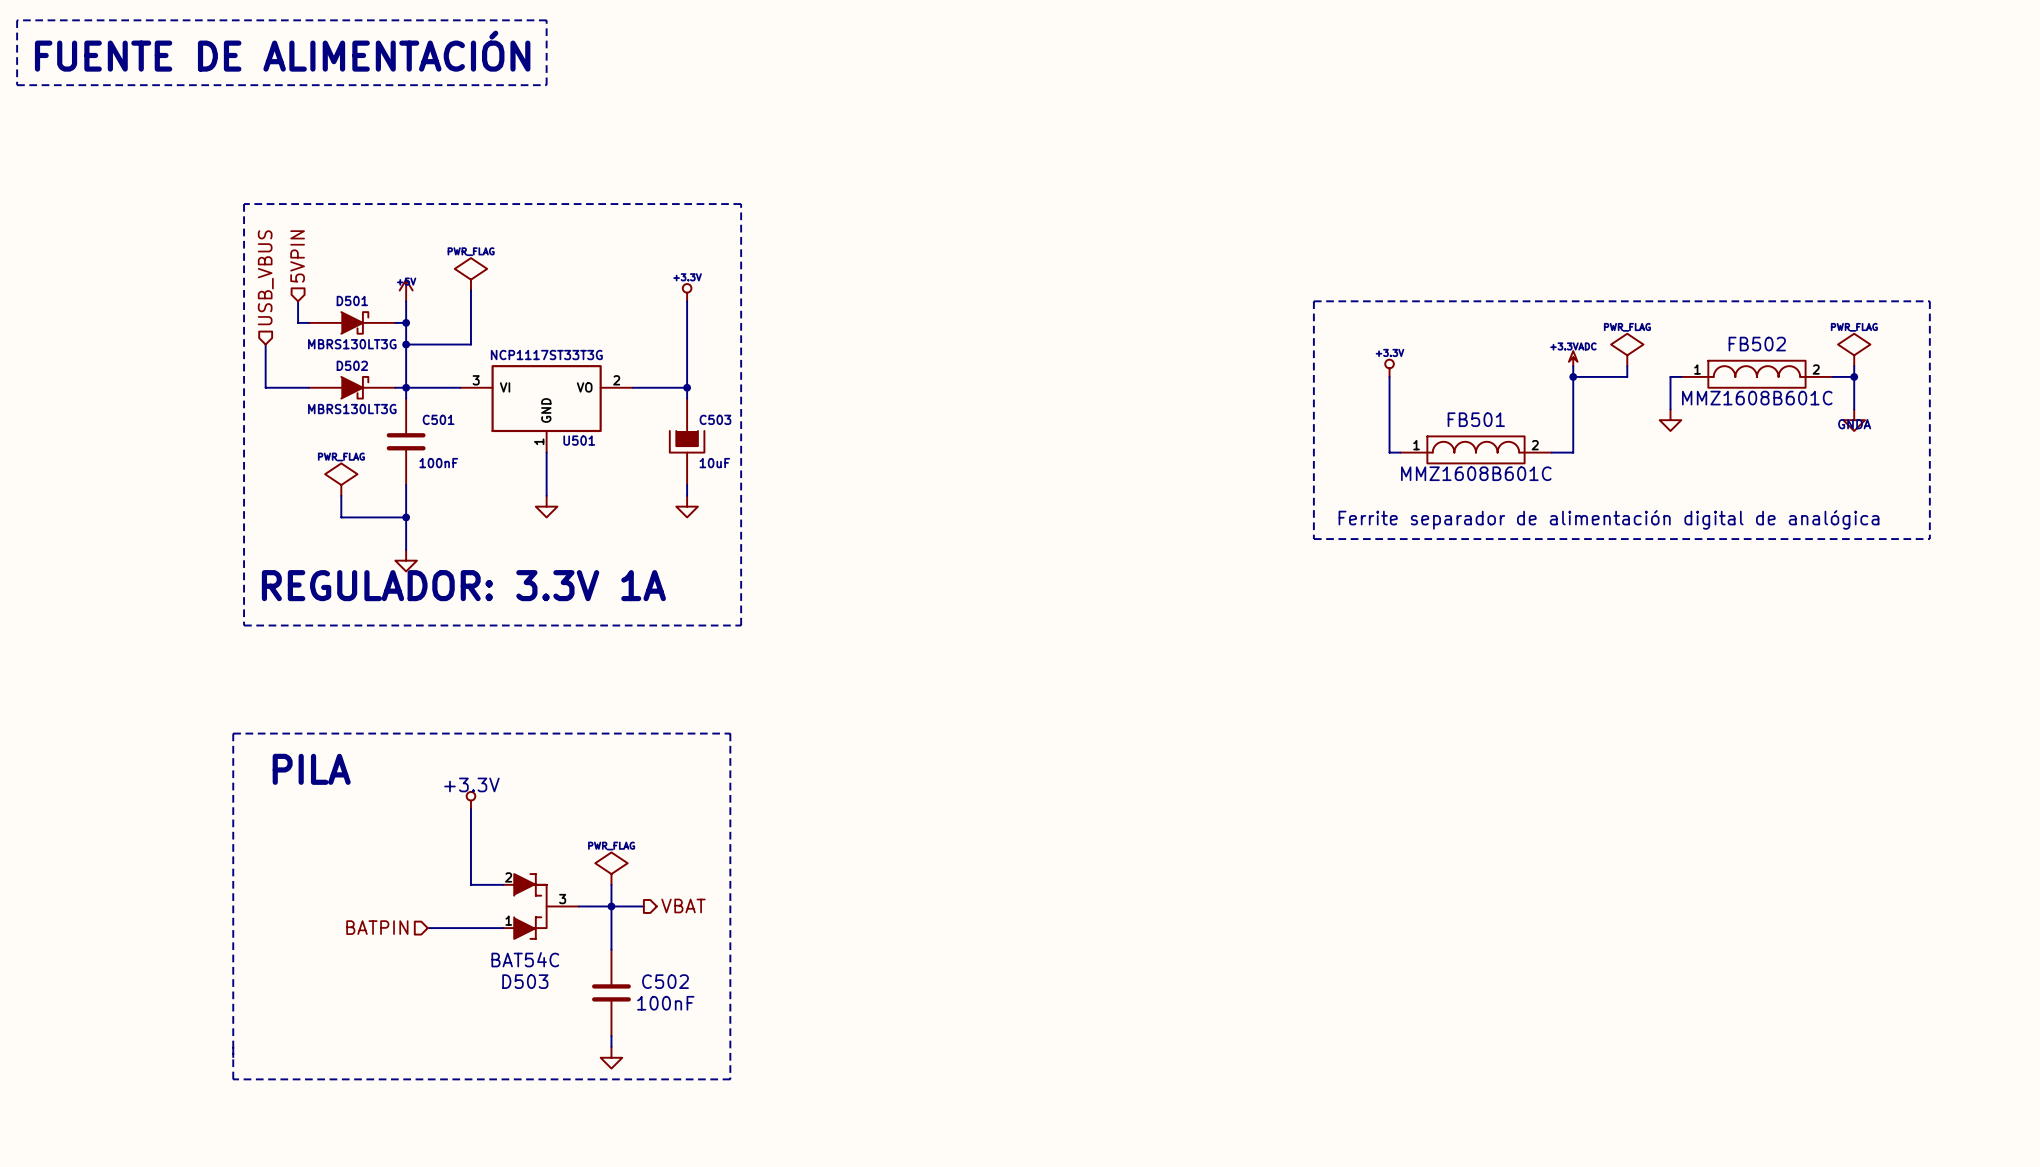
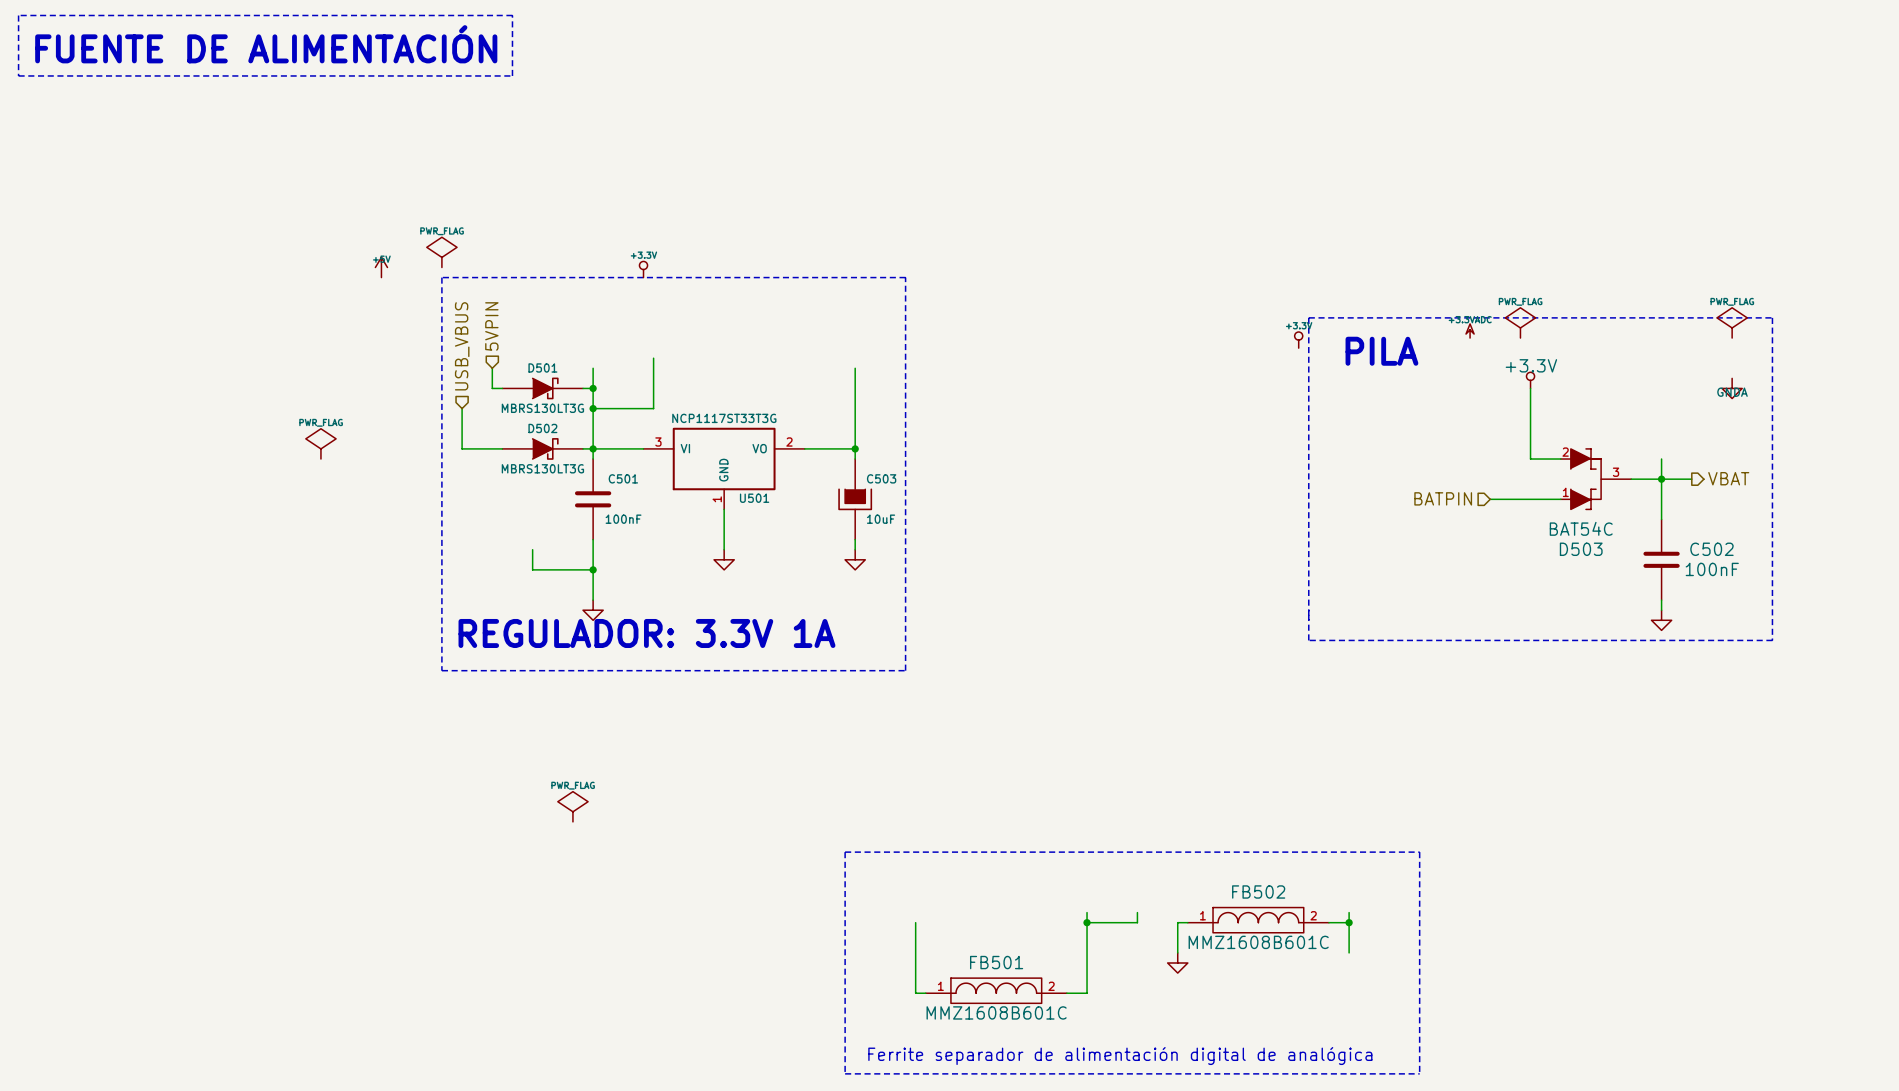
line: (244, 204) (244, 625) (741, 625) (741, 204) (244, 204) -> none
hierarchical label: 5VPIN (297, 256) -> none
hierarchical label: USB_VBUS (265, 277) -> none
wire: (470, 290) (470, 344) (406, 344) -> none
wire: (298, 301) (298, 322) (308, 322) -> none
wire: (406, 301) (406, 398) -> none
line: none -> (441, 277) (441, 670) (905, 670) (905, 277) (441, 277)
wire: (687, 301) (687, 398) -> (593, 368) (593, 459)
line: (1313, 301) (1929, 301) (1929, 539) (1313, 539) (1313, 301) -> none
D501 position: (352, 322) -> (542, 388)
wire: (395, 322) (406, 322) -> none
junction: (406, 322) -> none
wire: (265, 344) (265, 387) (308, 387) -> none
junction: (406, 344) -> none
line: none -> (1308, 317) (1308, 640) (1772, 640) (1772, 317) (1308, 317)
hierarchical label: none -> 5VPIN (491, 326)
wire: (1573, 366) (1573, 452) (1551, 452) -> none
wire: (1627, 366) (1627, 376) (1573, 376) -> none
wire: (1854, 366) (1854, 409) -> none
FB502 position: (1756, 374) -> (1258, 920)
hierarchical label: none -> USB_VBUS (462, 346)
wire: (1389, 376) (1389, 452) (1400, 452) -> none
junction: (1573, 376) -> none
wire: (1681, 376) (1670, 376) (1670, 409) -> none
wire: (1832, 376) (1854, 376) -> none
junction: (1854, 376) -> none
text: none -> PILA (1381, 351)
D502 position: (352, 387) -> (542, 448)
wire: (395, 387) (460, 387) -> none
junction: (406, 387) -> none
wire: (633, 387) (687, 387) -> none
junction: (687, 387) -> none
wire: none -> (653, 358) (653, 408) (593, 408)
wire: none -> (492, 368) (492, 388) (502, 388)
wire: none -> (855, 368) (855, 459)
U501 position: (546, 408) -> (724, 468)
power symbol: none -> +3.3V (1530, 380)
wire: none -> (583, 388) (593, 388)
junction: none -> (593, 388)
wire: none -> (1530, 388) (1530, 459) (1560, 459)
power symbol: (1670, 420) -> none
C501 position: (406, 441) -> (593, 499)
wire: none -> (462, 408) (462, 448) (502, 448)
junction: none -> (593, 408)
C503 position: (687, 441) -> (855, 499)
FB501 position: (1475, 449) -> (996, 990)
wire: (546, 452) (546, 495) -> none
wire: (406, 485) (406, 549) -> none
junction: none -> (593, 448)
wire: (687, 485) (687, 495) -> (643, 448) (583, 448)
wire: none -> (804, 448) (855, 448)
junction: none -> (855, 448)
wire: (341, 495) (341, 517) (406, 517) -> none
wire: none -> (1661, 459) (1661, 519)
power symbol: (546, 506) -> none
power symbol: (687, 506) -> none
hierarchical label: none -> VBAT (1728, 478)
junction: (406, 517) -> none
wire: none -> (1631, 479) (1691, 479)
junction: none -> (1661, 479)
text: Ferrite separador de alimentación digital de analógica (1608, 519) -> none
hierarchical label: none -> BATPIN (1443, 498)
wire: none -> (724, 509) (724, 549)
power symbol: (406, 560) -> none
wire: none -> (593, 539) (593, 600)
wire: none -> (855, 539) (855, 549)
text: REGULADOR: 3.3V 1A (463, 585) -> none
wire: none -> (532, 549) (532, 569) (593, 569)
power symbol: none -> (724, 559)
power symbol: none -> (855, 559)
junction: none -> (593, 569)
wire: none -> (1661, 600) (1661, 610)
power symbol: none -> (593, 610)
power symbol: none -> (1661, 620)
text: none -> REGULADOR: 3.3V 1A (646, 633)
line: (233, 733) (233, 1079) (730, 1079) (730, 733) (233, 733) -> none
text: PILA (311, 769) -> none
power symbol: +3.3V (470, 800) -> none
wire: (470, 809) (470, 884) (503, 884) -> none
wire: (611, 884) (611, 949) -> none
hierarchical label: VBAT (683, 905) -> none
D503 position: (541, 906) -> (1596, 479)
wire: (579, 906) (643, 906) -> none
junction: (611, 906) -> none
line: none -> (845, 852) (1419, 852) (1419, 1073) (845, 1073) (845, 852)
hierarchical label: BATPIN (377, 927) -> none
wire: (427, 928) (503, 928) -> none
wire: none -> (1087, 912) (1087, 993) (1066, 993)
wire: none -> (1137, 912) (1137, 922) (1087, 922)
wire: none -> (1349, 912) (1349, 952)
C502 position: (611, 992) -> (1661, 559)
wire: none -> (915, 922) (915, 993) (925, 993)
junction: none -> (1087, 922)
wire: none -> (1187, 922) (1177, 922) (1177, 952)
wire: none -> (1328, 922) (1349, 922)
junction: none -> (1349, 922)
wire: (611, 1036) (611, 1046) -> none
power symbol: none -> (1177, 963)
power symbol: (611, 1057) -> none
text: none -> Ferrite separador de alimentación digital de analógica (1120, 1056)

